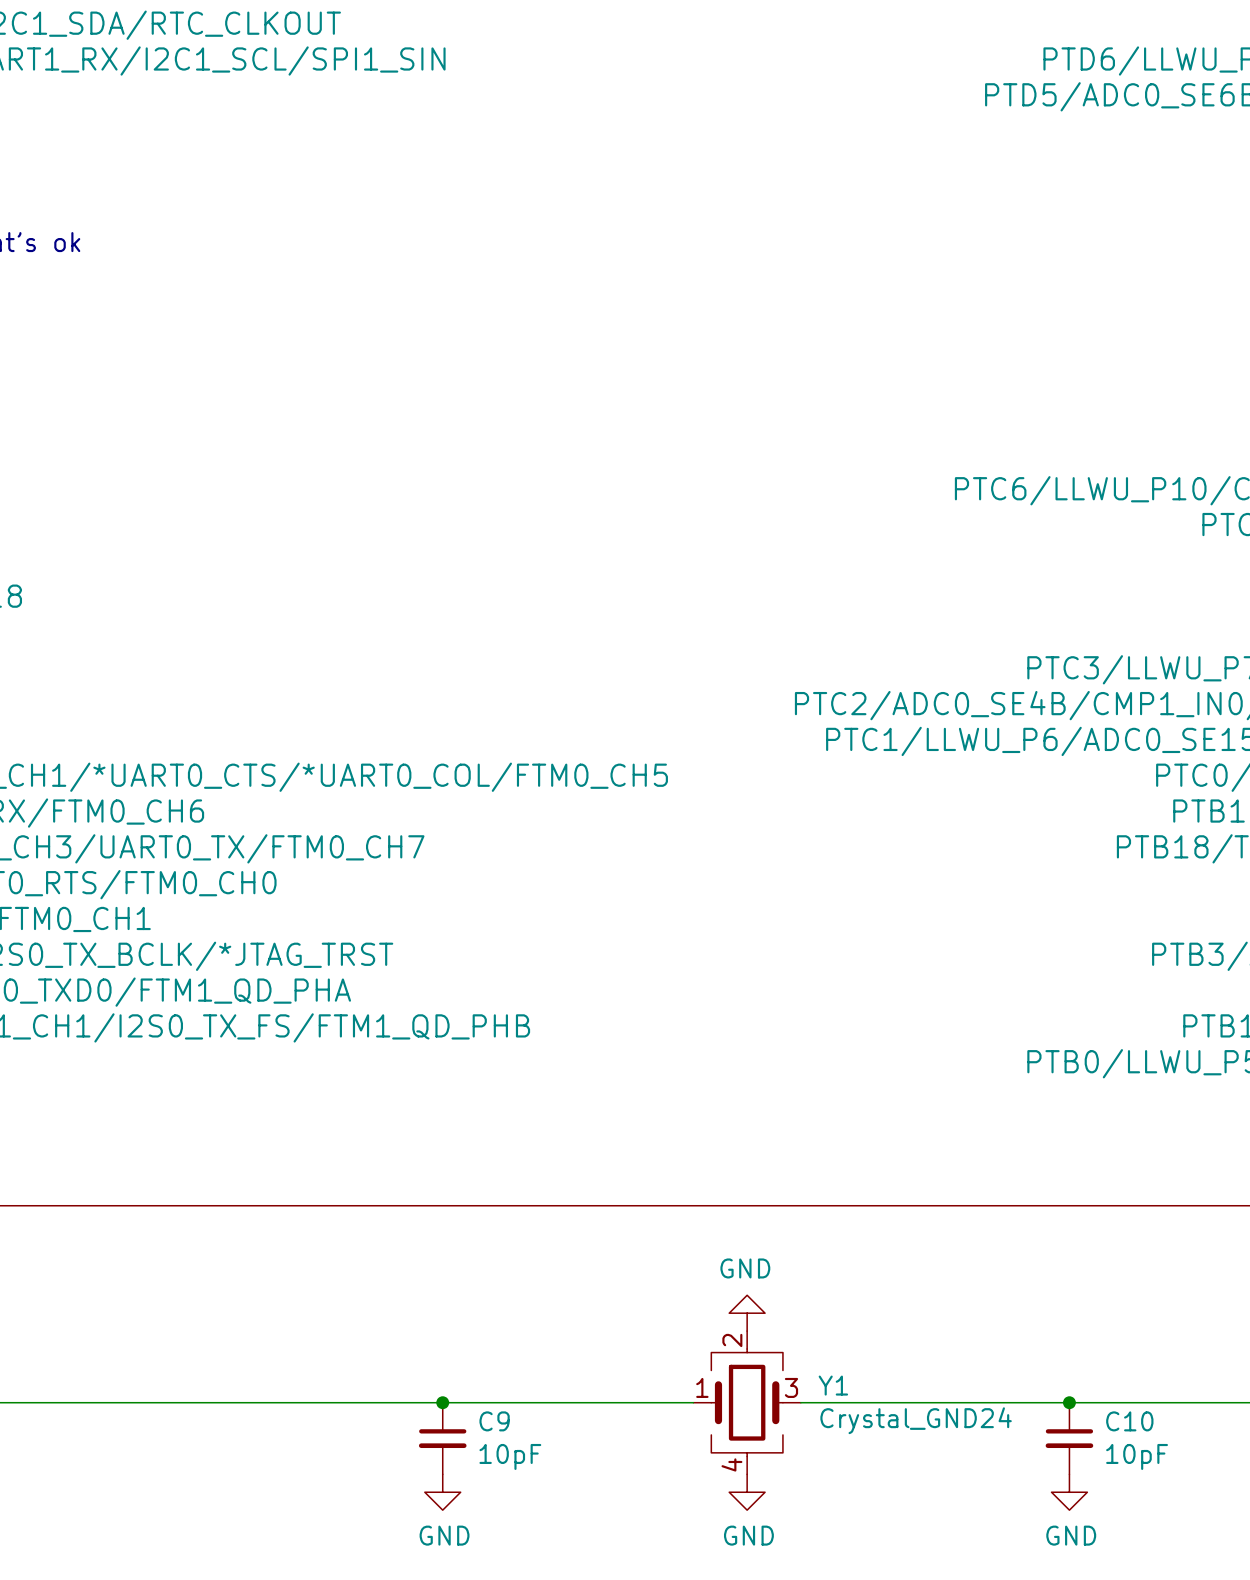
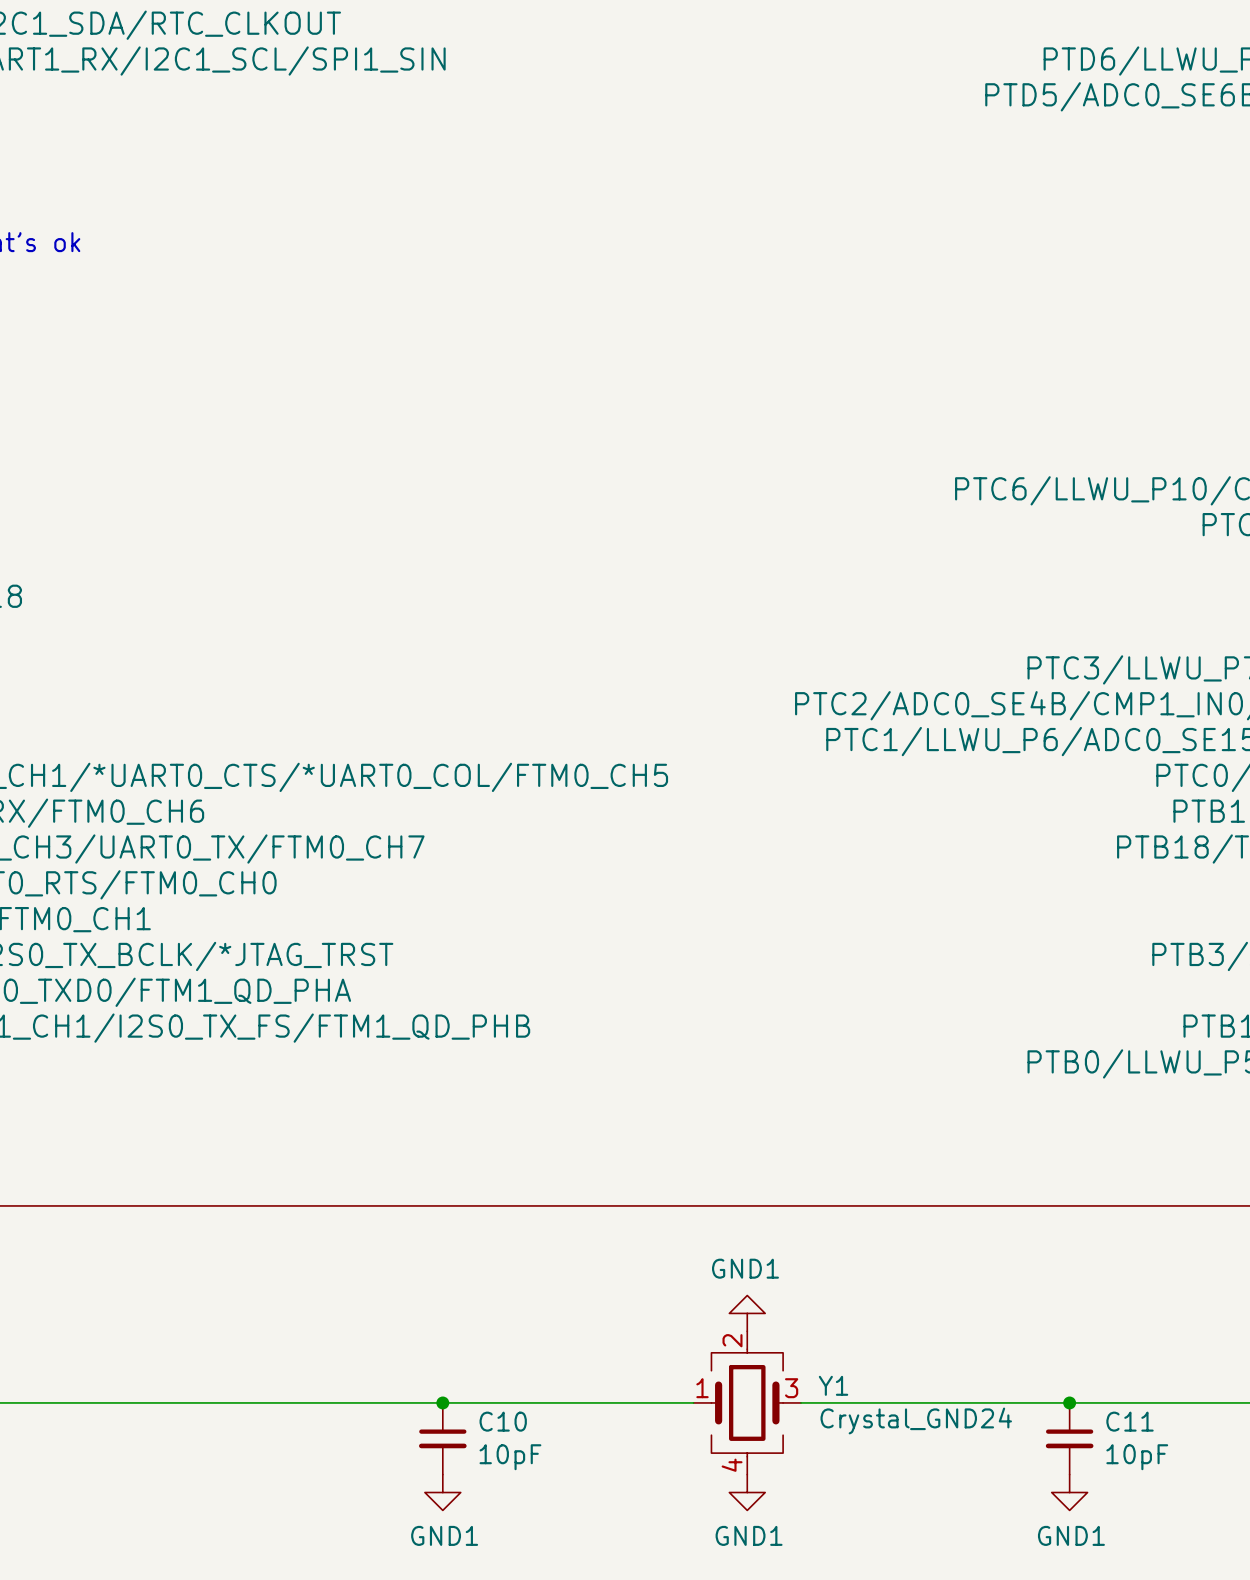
power symbol: GND (747, 1313) -> GND1 (747, 1313)
C9 name: C9 (494, 1421) -> C10 (503, 1421)
C10 name: C10 (1129, 1421) -> C11 (1130, 1421)
power symbol: GND (442, 1492) -> GND1 (442, 1492)
power symbol: GND (747, 1492) -> GND1 (747, 1492)
power symbol: GND (1069, 1492) -> GND1 (1069, 1492)

